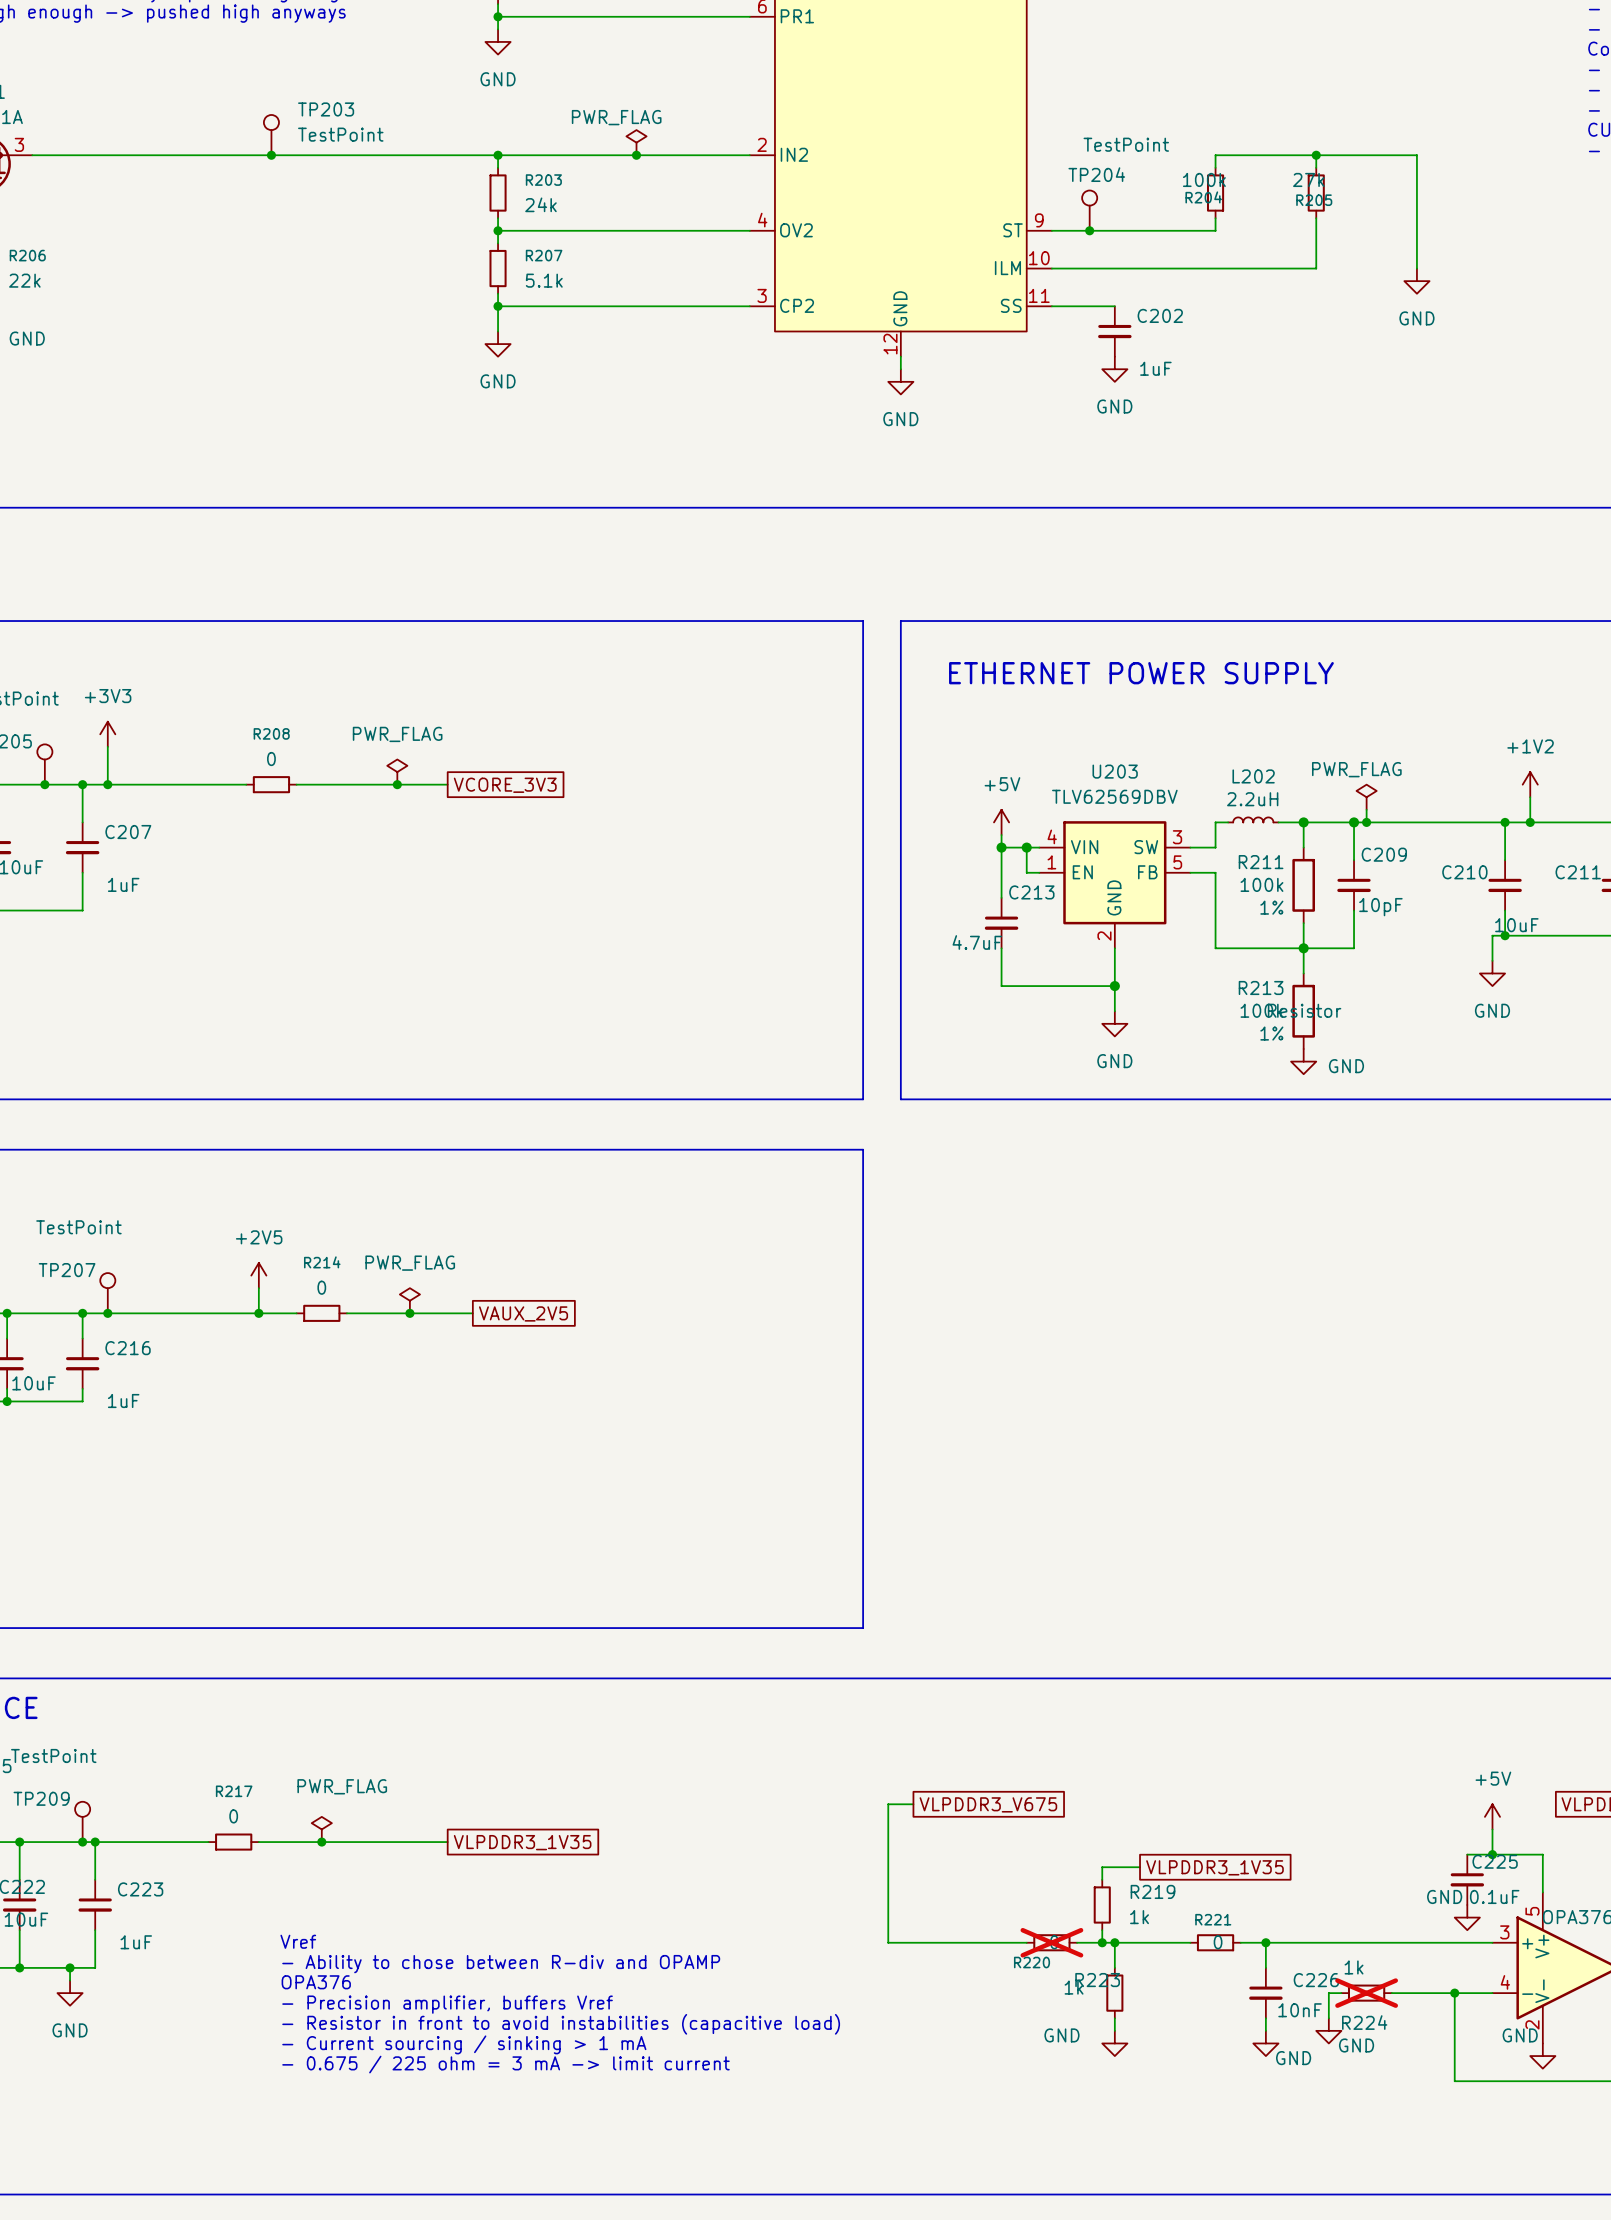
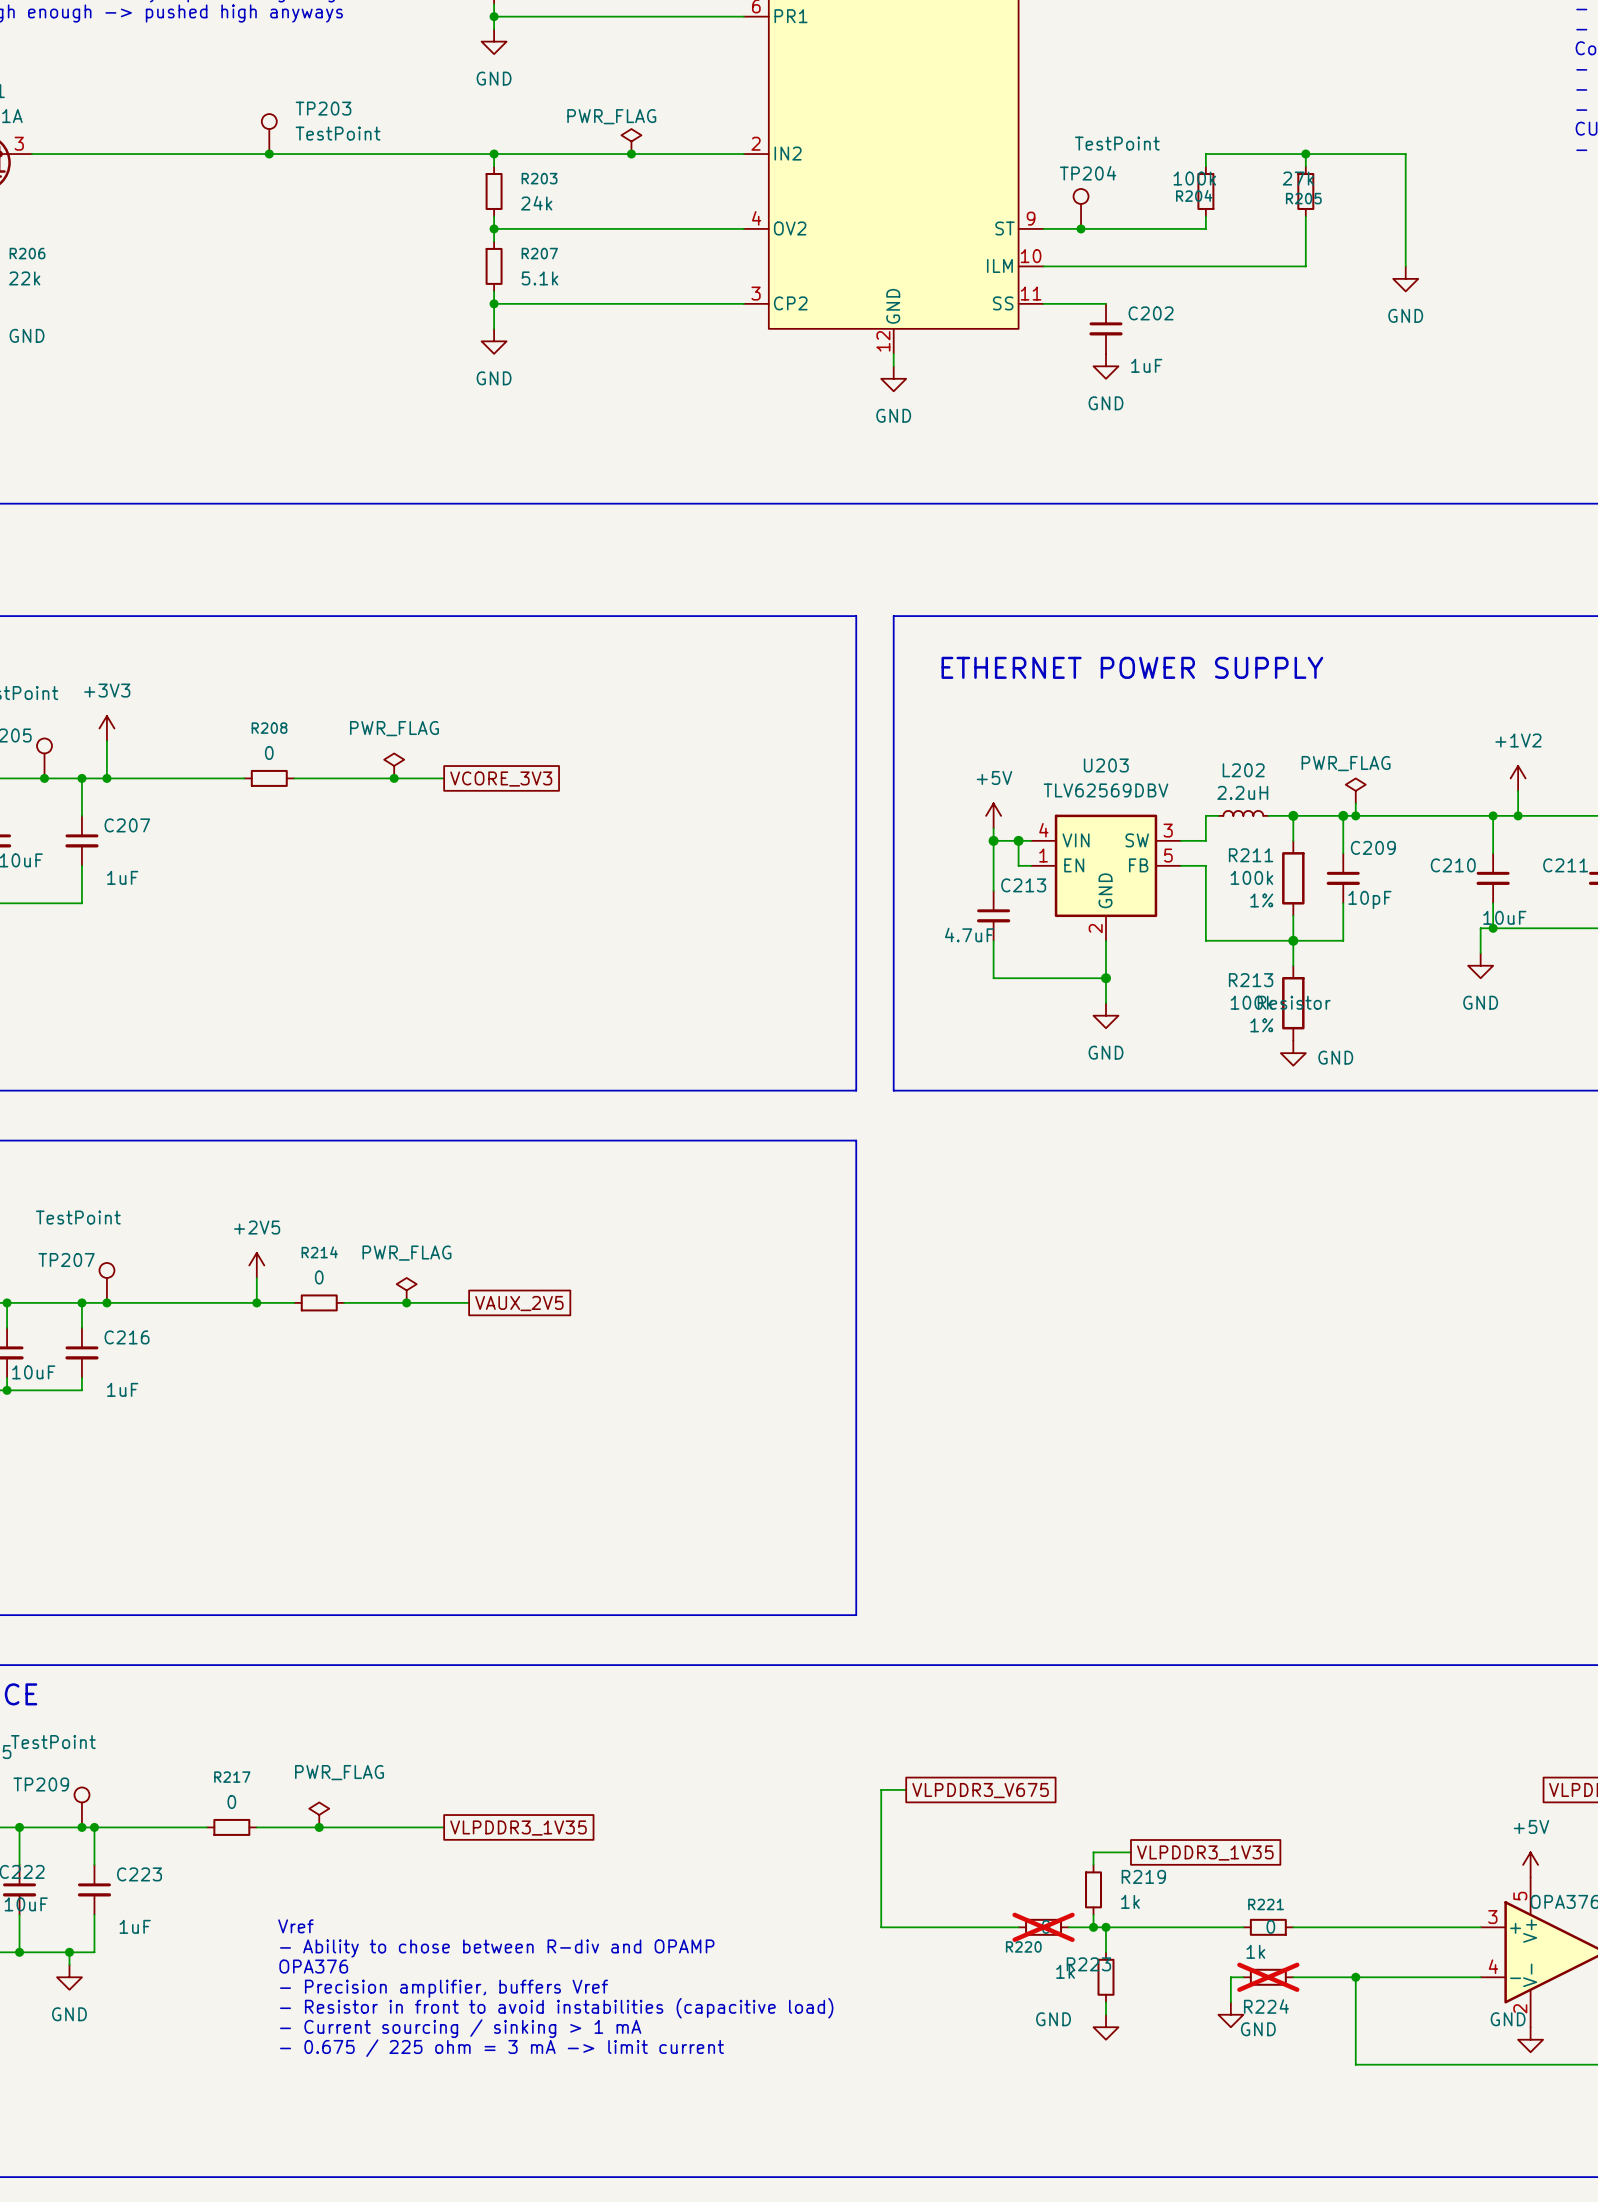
power symbol position: +5V (1492, 1816) -> +5V (1530, 1864)
wire: (1492, 1829) (1492, 1854) -> none
wire: (1467, 1854) (1542, 1854) (1542, 1892) -> none
junction: (1492, 1854) -> none
C225: 0.1uF (1467, 1879) -> none
power symbol: GND (1467, 1917) -> none
R221 position: (1215, 1942) -> (1268, 1927)
wire: (1253, 1942) (1303, 1942) -> (1180, 1927) (1230, 1927)
wire: (1265, 1942) (1265, 1967) -> none
junction: (1265, 1942) -> none
wire: none -> (1243, 1977) (1230, 1977) (1230, 2002)
C226: 10nF (1265, 1993) -> none
wire: (1328, 1993) (1328, 2018) -> (1318, 1977) (1293, 1977)
junction: none -> (1355, 1977)
R224 position: (1366, 1993) -> (1268, 1977)
wire: (1454, 1993) (1454, 2081) -> (1355, 1977) (1355, 2064) (1443, 2064)
junction: (1454, 1993) -> none
wire: (1265, 2018) (1265, 2030) -> none
power symbol: GND (1328, 2030) -> none
power symbol position: GND (1265, 2043) -> GND (1230, 2014)

